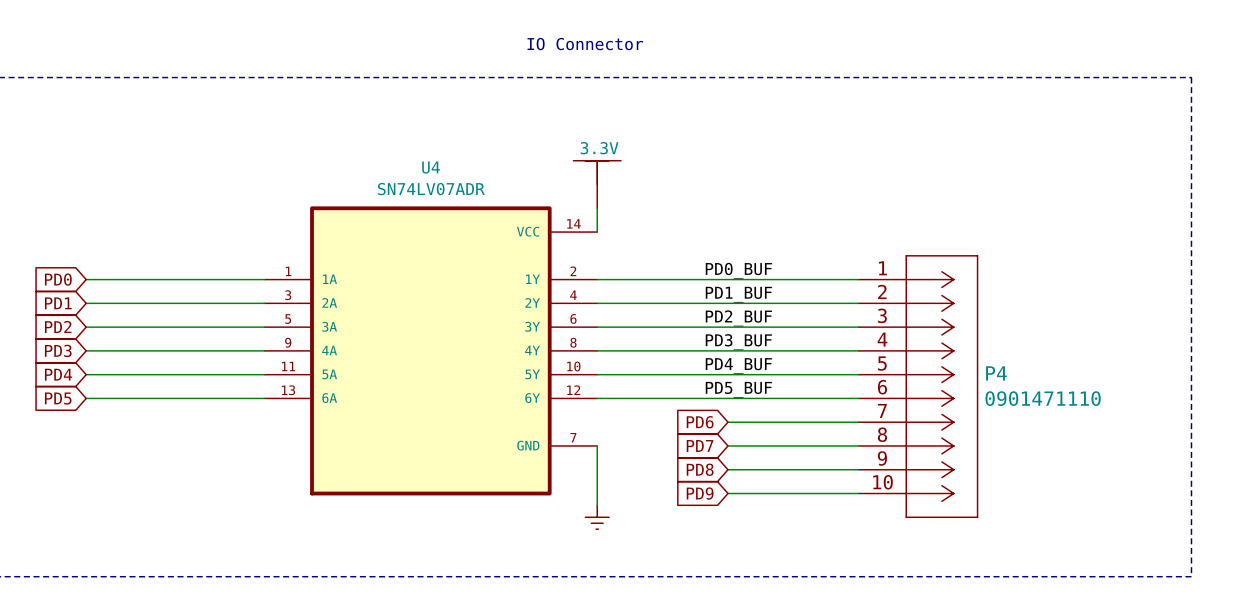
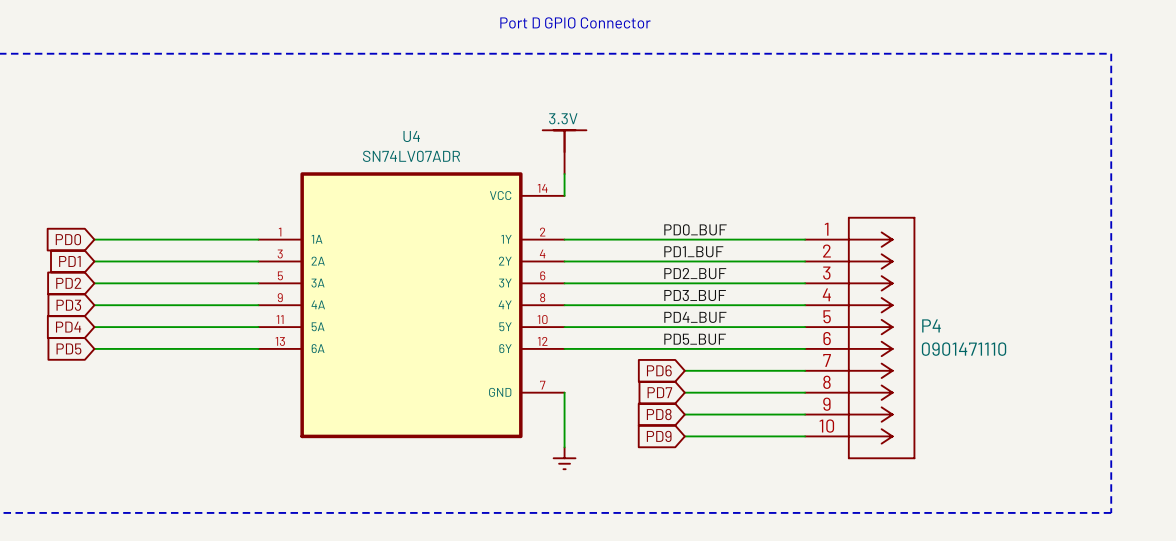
text: IO Connector (585, 44) -> Port D GPIO Connector (575, 22)

